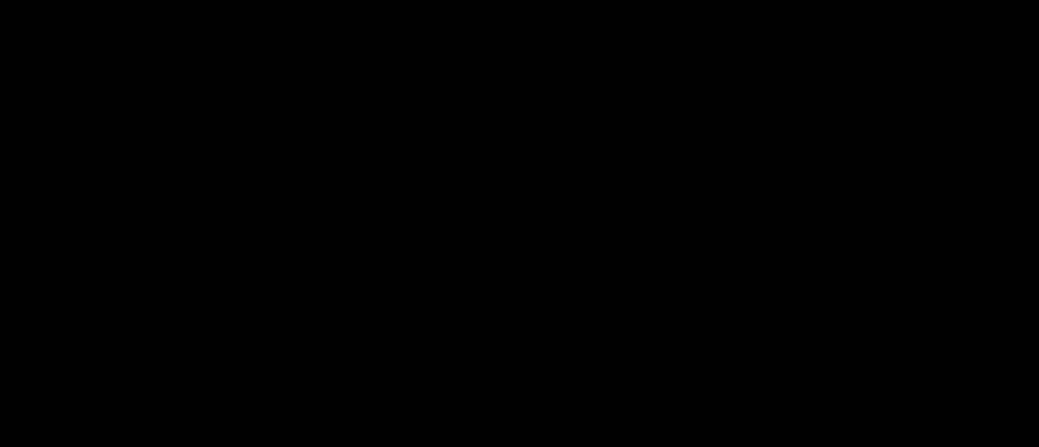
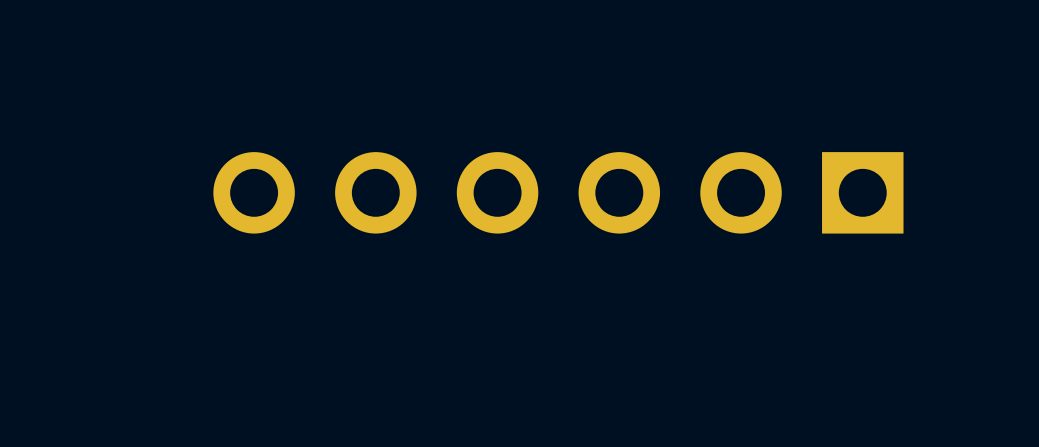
part: none -> (558, 192)

